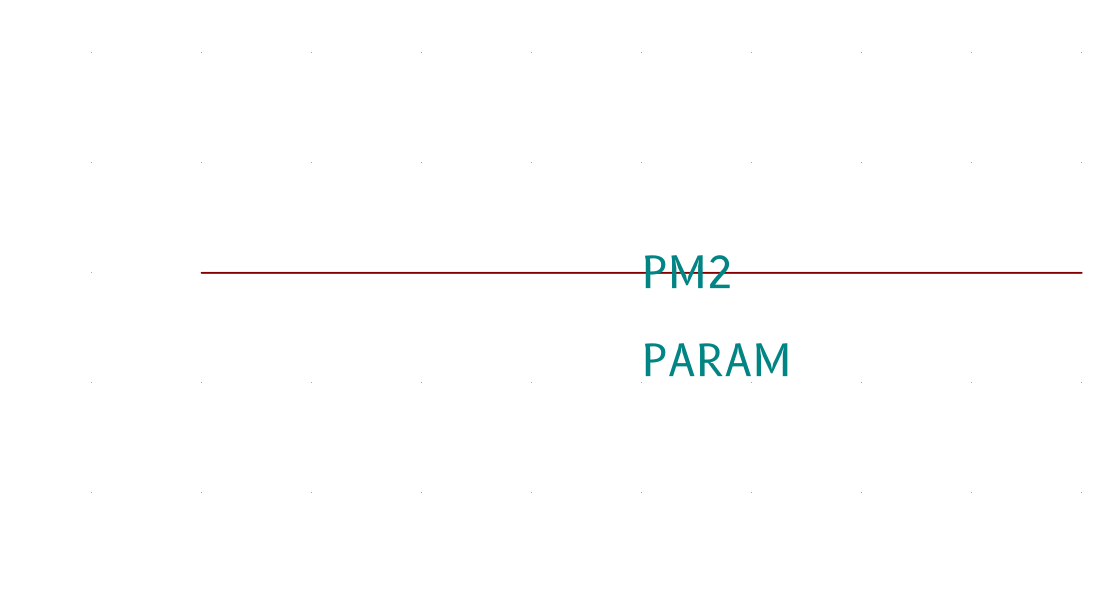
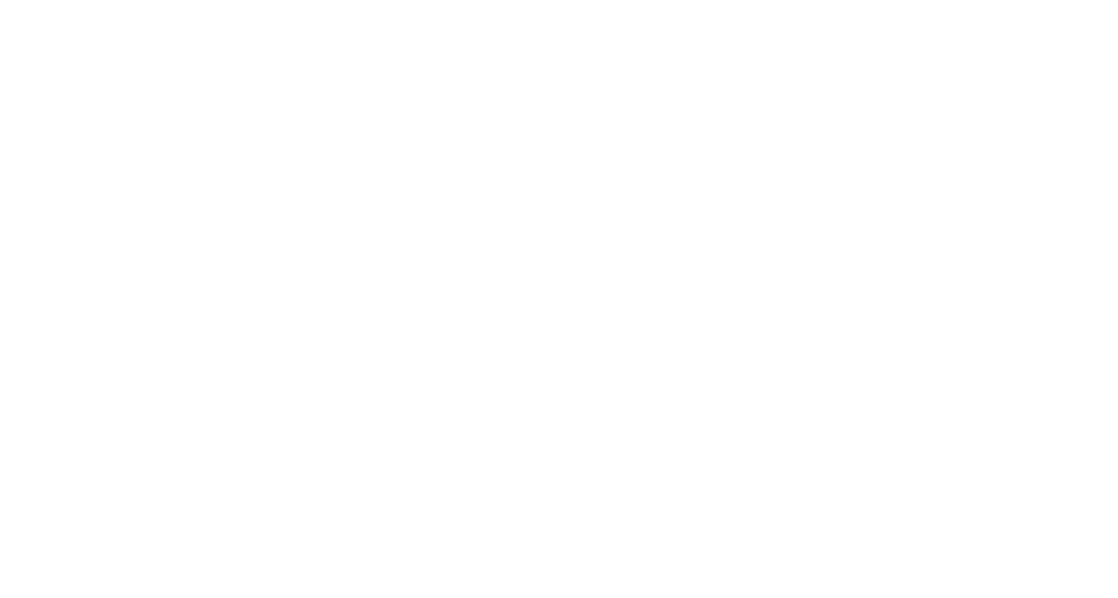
PM2: PARAM (641, 272) -> none

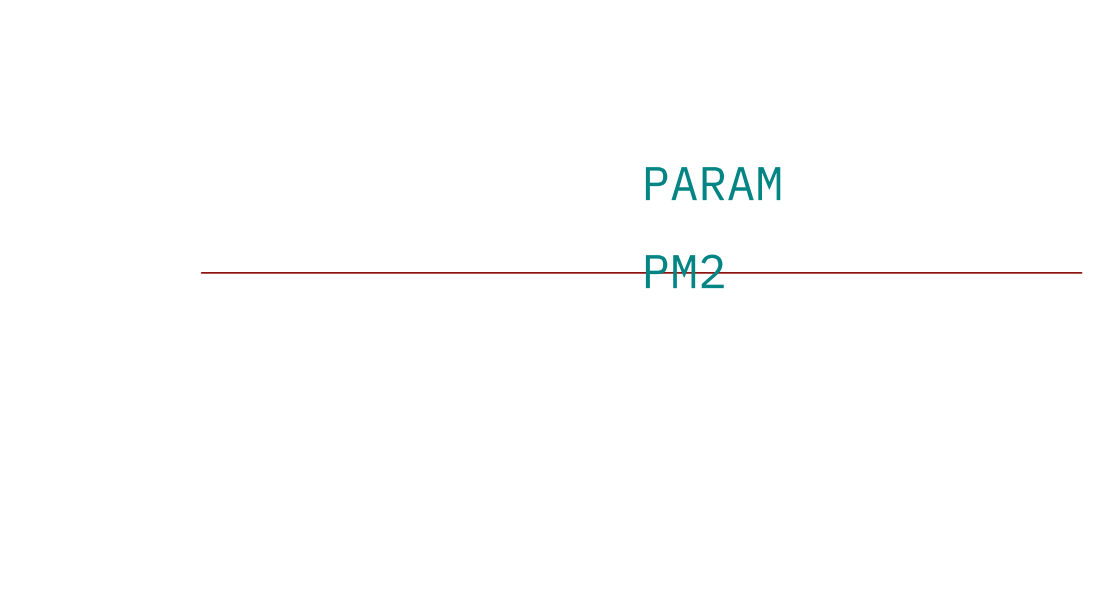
PM2: none -> PARAM (641, 272)

